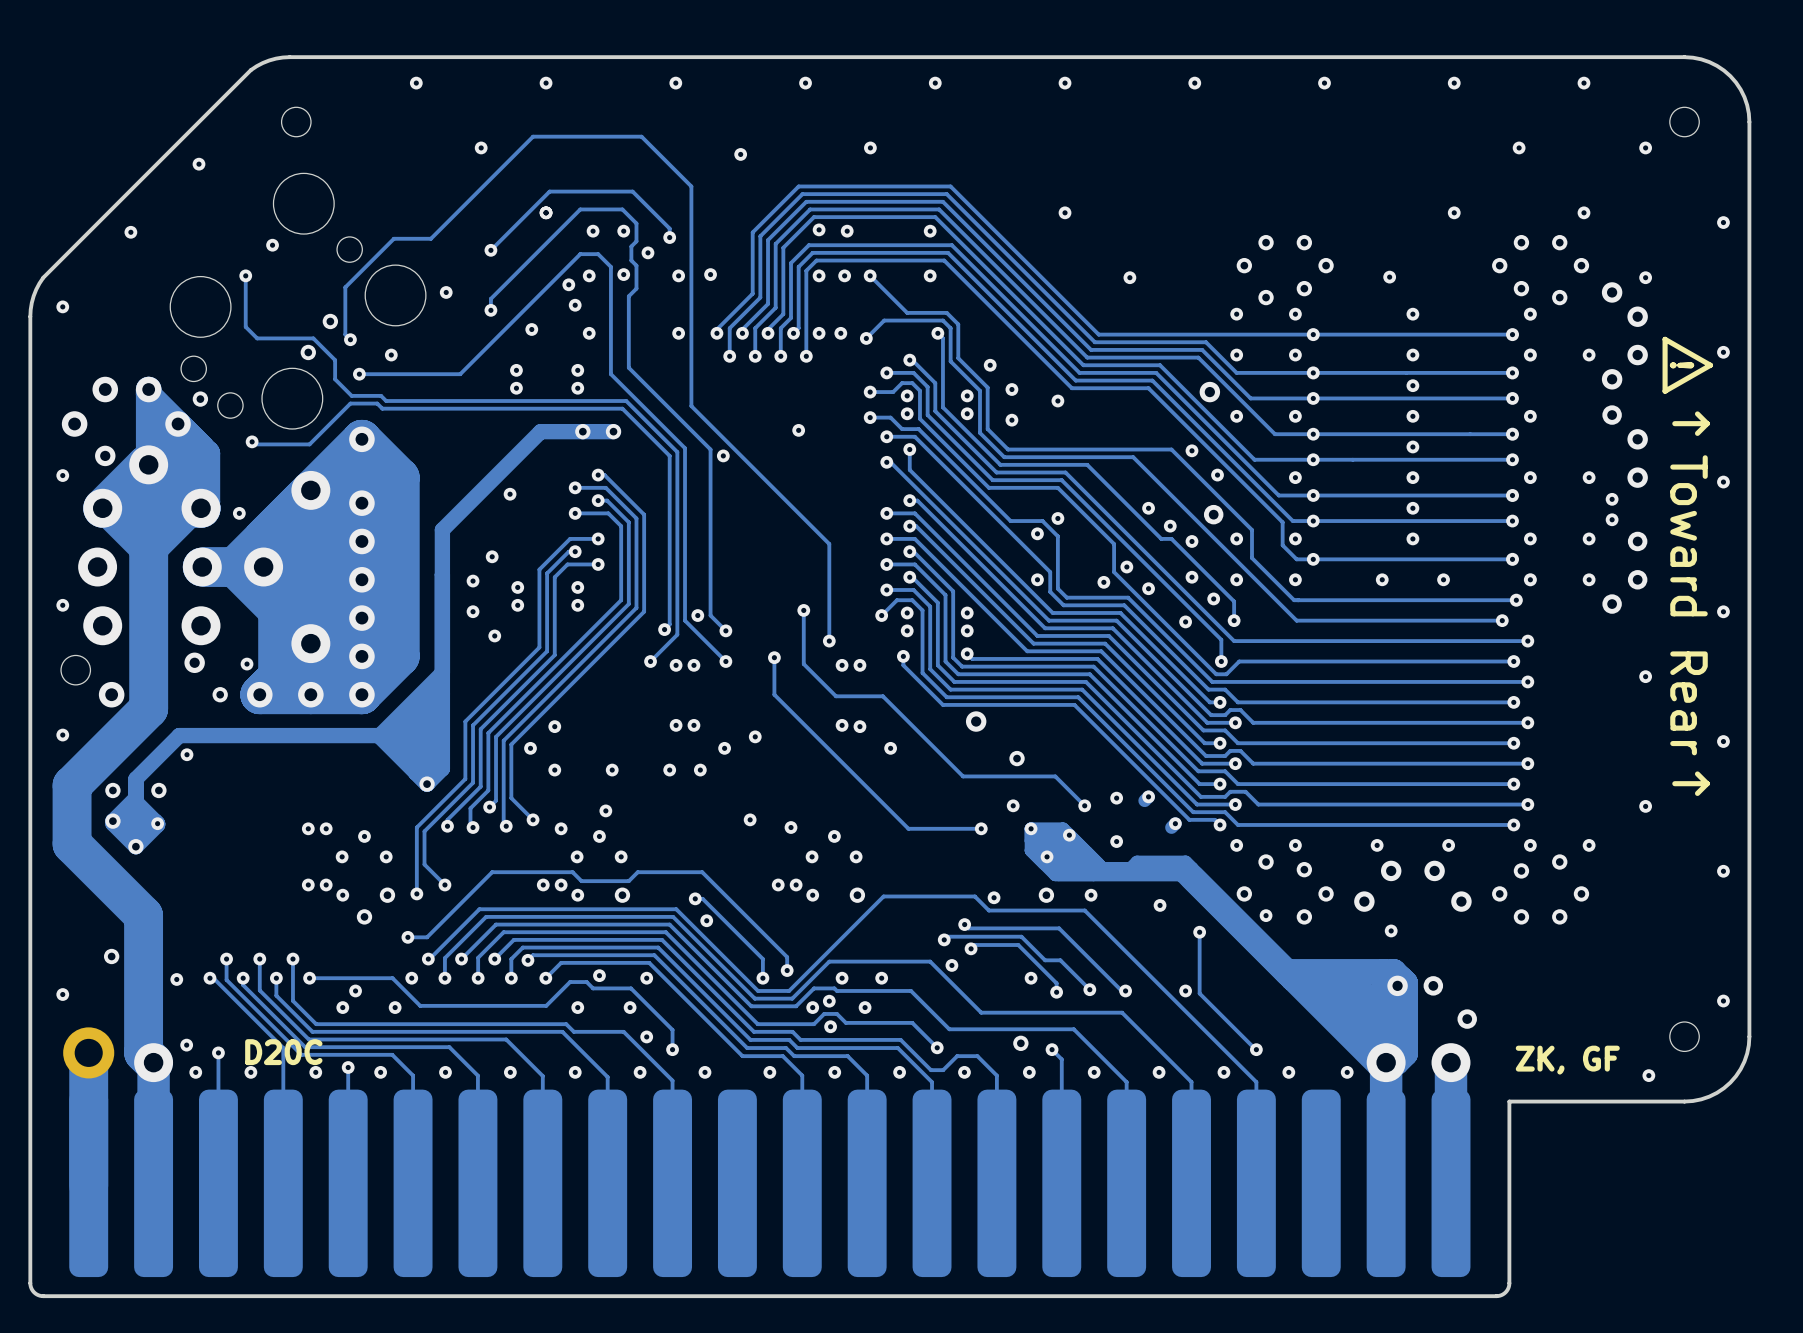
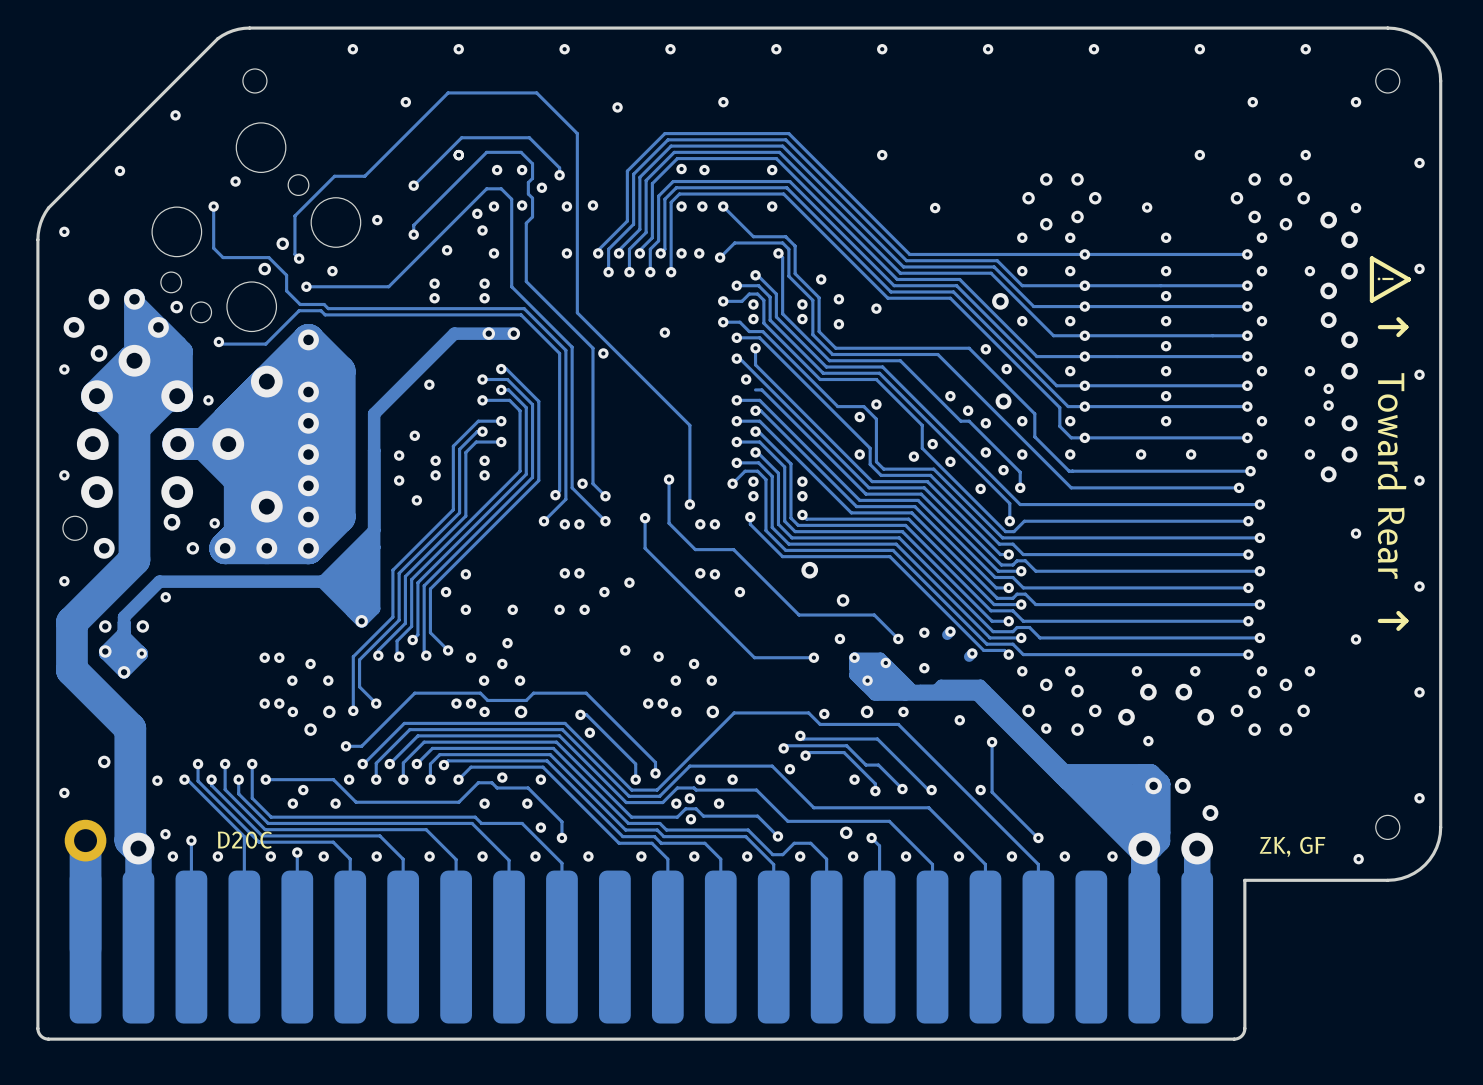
via position: (909, 500) -> (746, 379)

